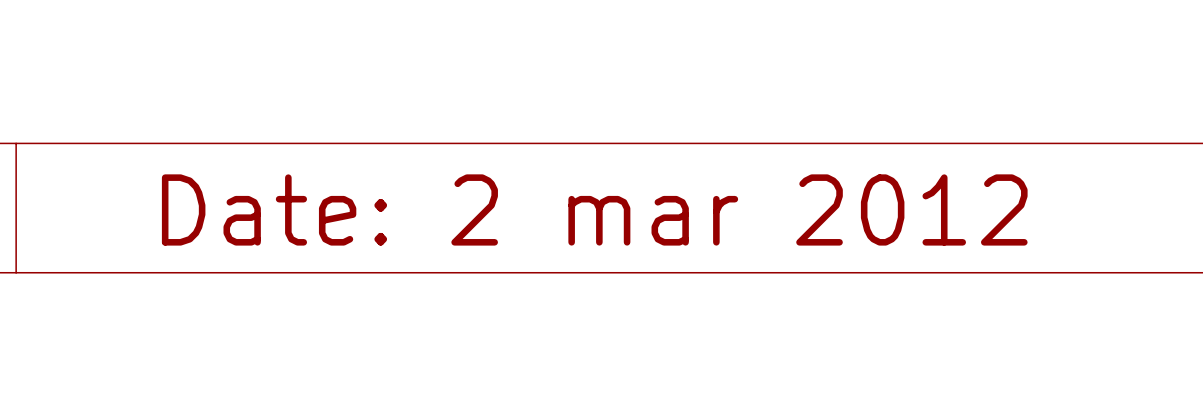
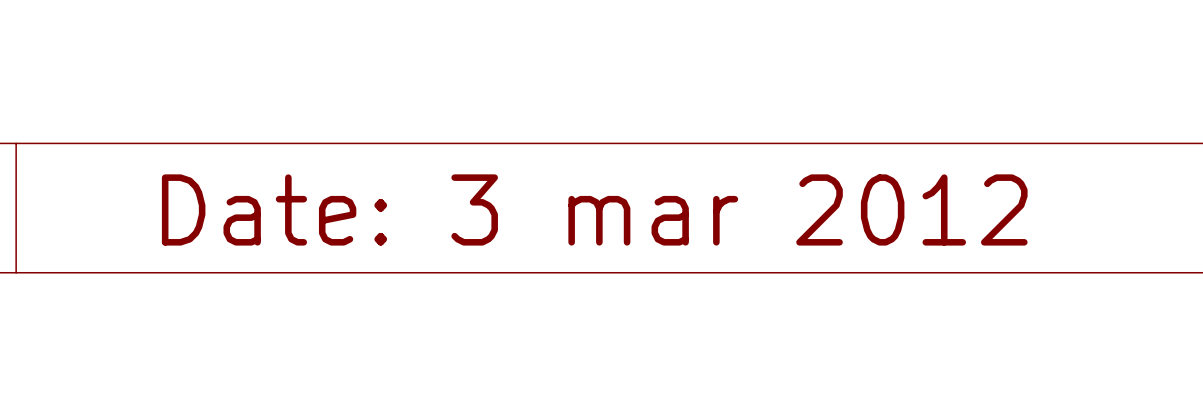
title block: Date: 2 mar 2012 (594, 209) -> Date: 3 mar 2012 (594, 209)

